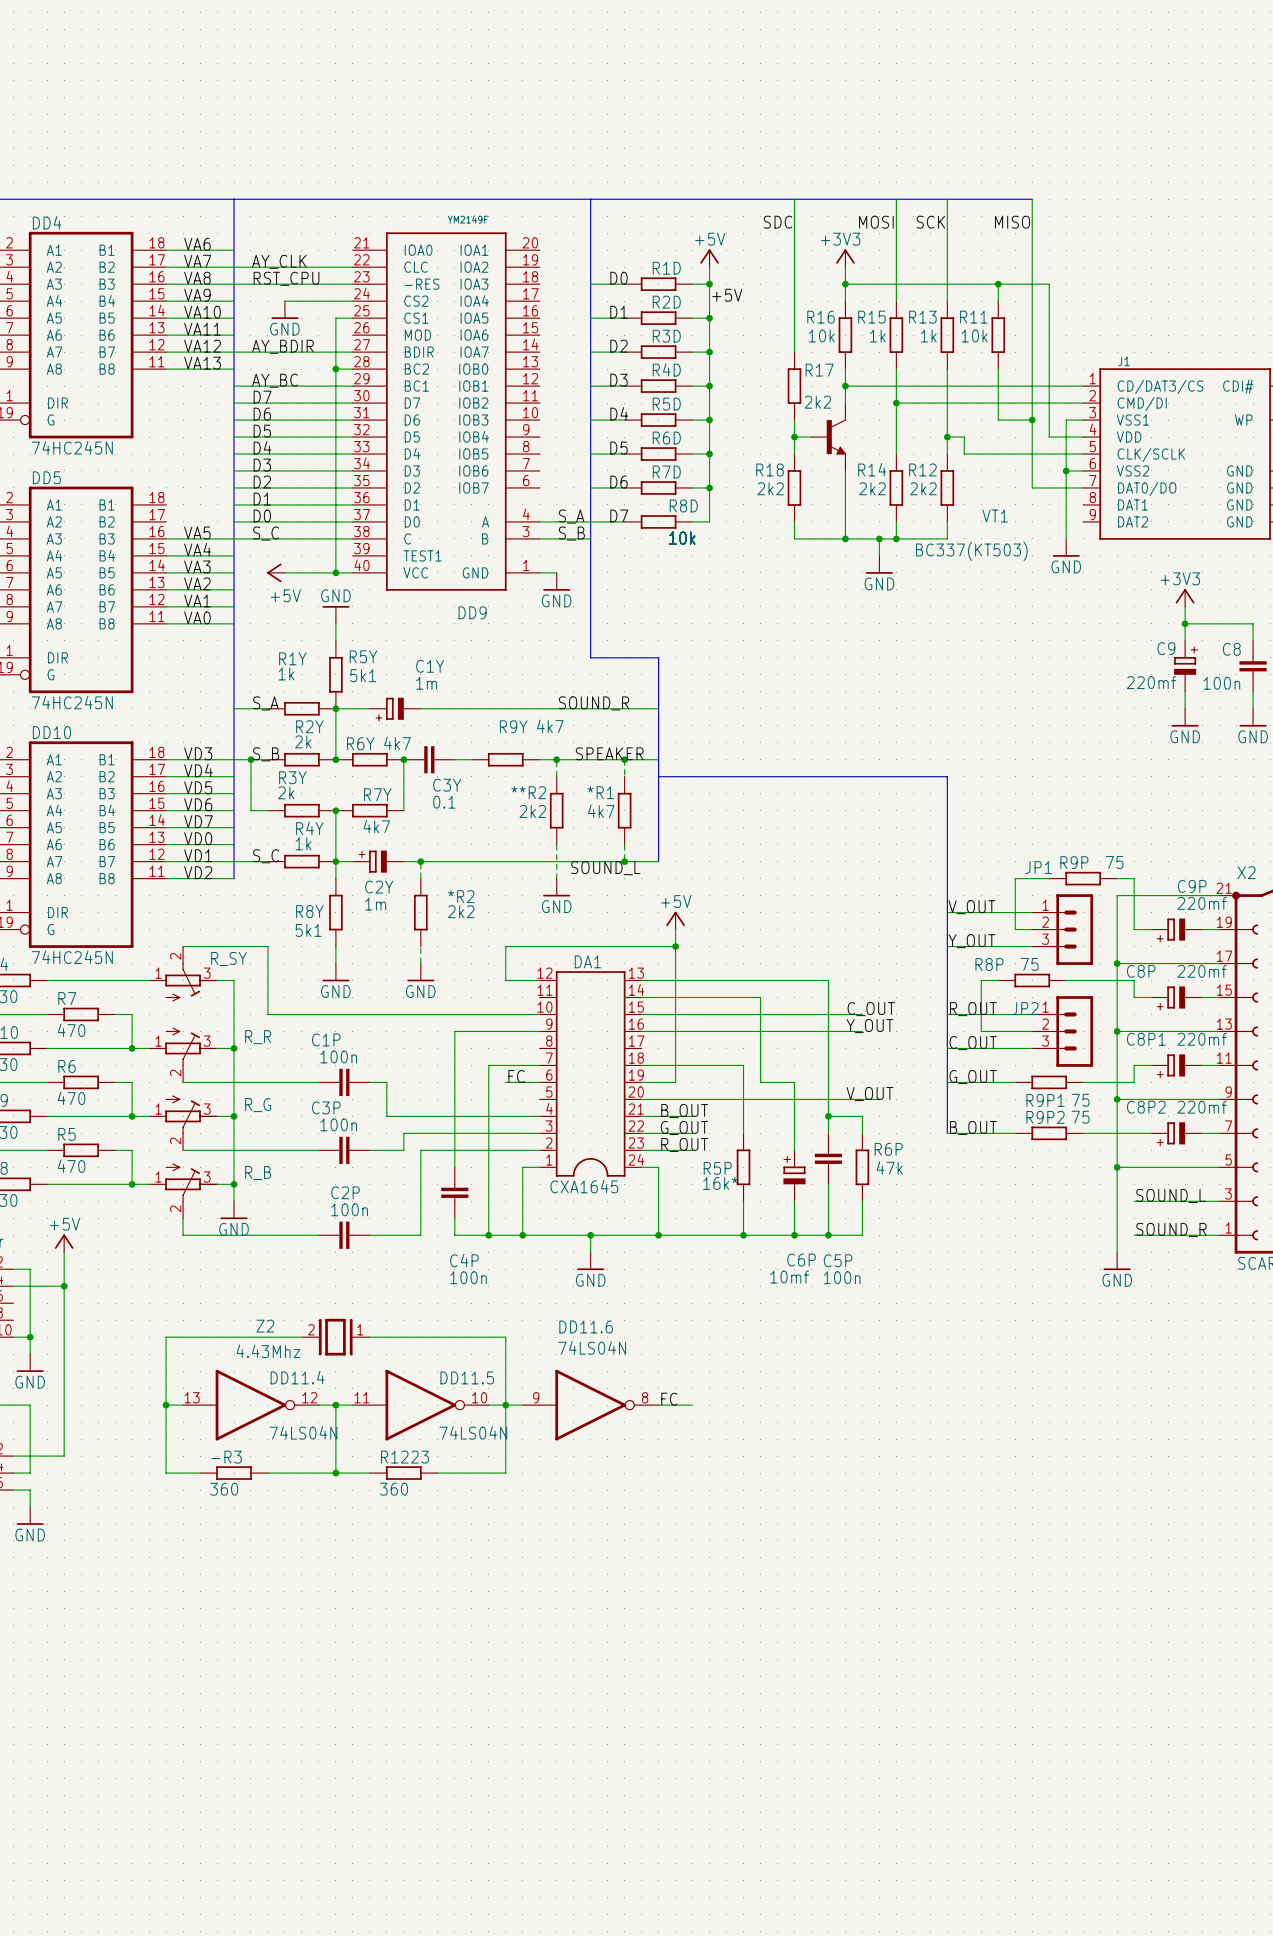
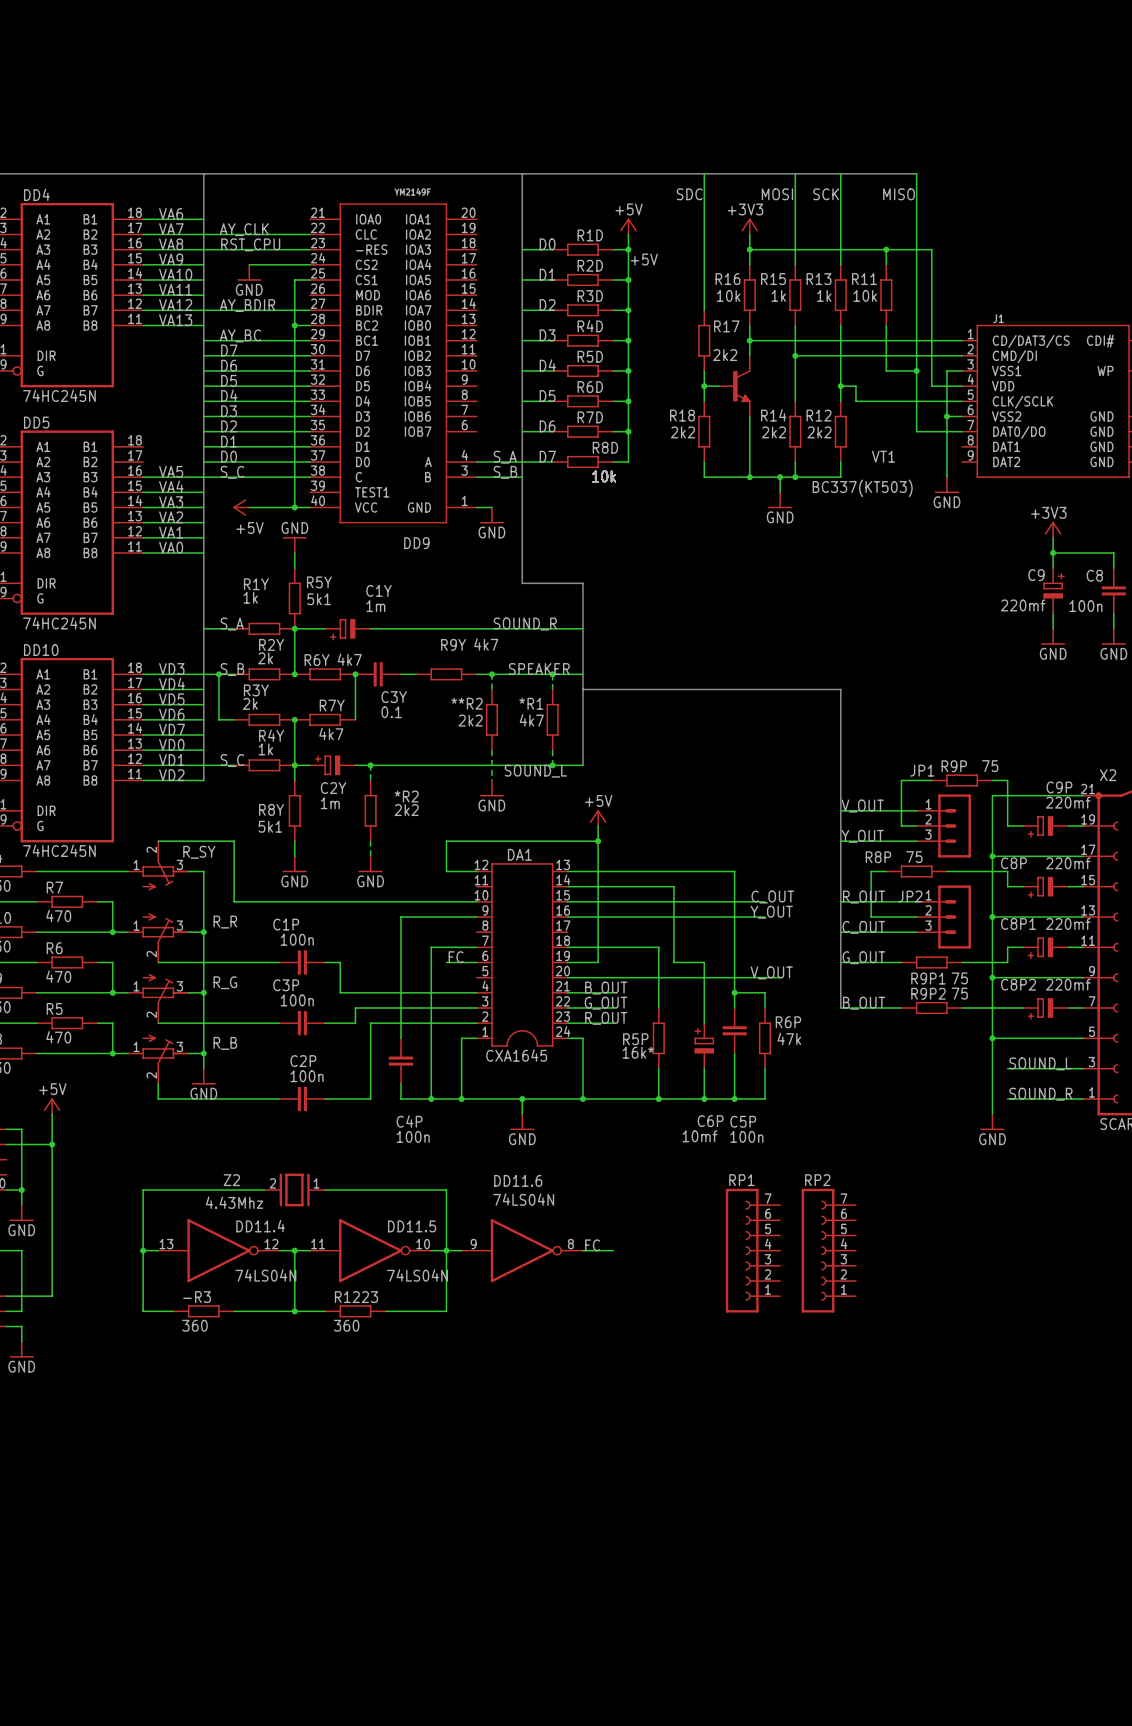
RP1: none -> (752, 1250)
RP2: none -> (828, 1250)

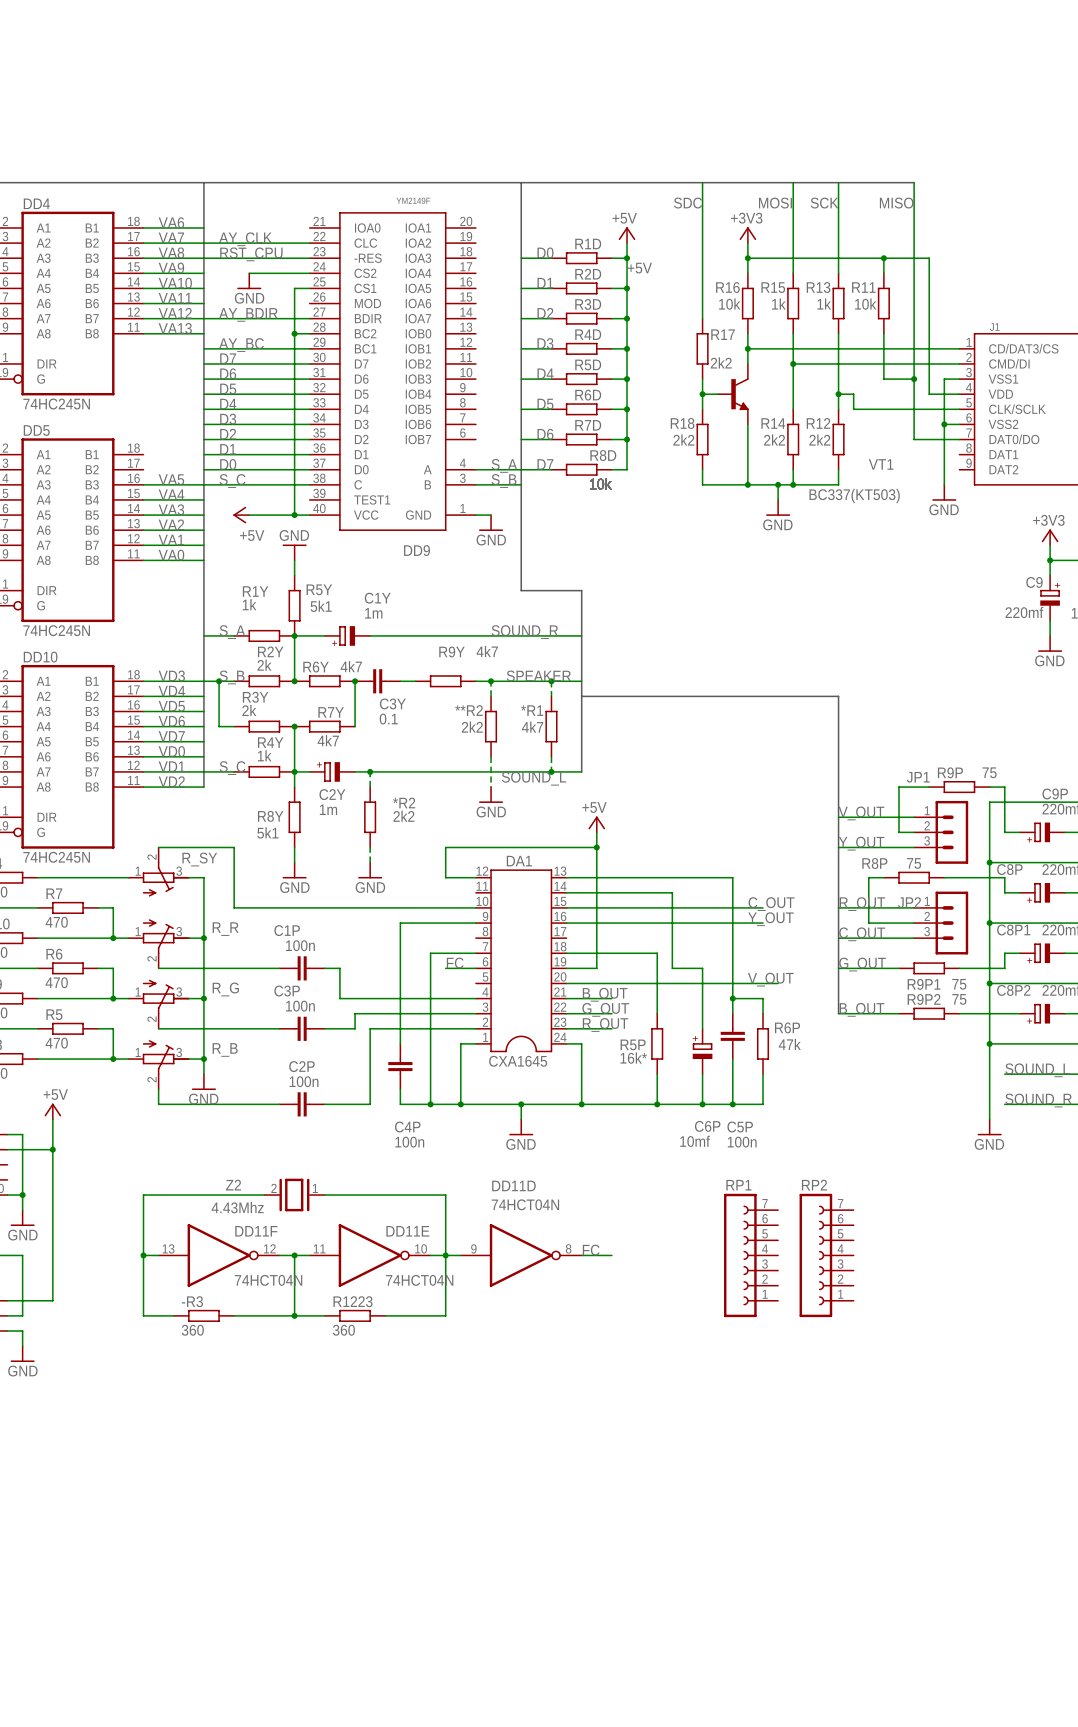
DD11.6 name: DD11.6 (518, 1180) -> DD11D (513, 1185)
DD11.6 value: 74LS04N (523, 1199) -> 74HCT04N (525, 1204)
DD11.4 name: DD11.4 (260, 1226) -> DD11F (256, 1231)
DD11.5 name: DD11.5 (412, 1226) -> DD11E (407, 1231)
DD11.4 value: 74LS04N (265, 1275) -> 74HCT04N (268, 1280)
DD11.5 value: 74LS04N (417, 1275) -> 74HCT04N (419, 1280)

